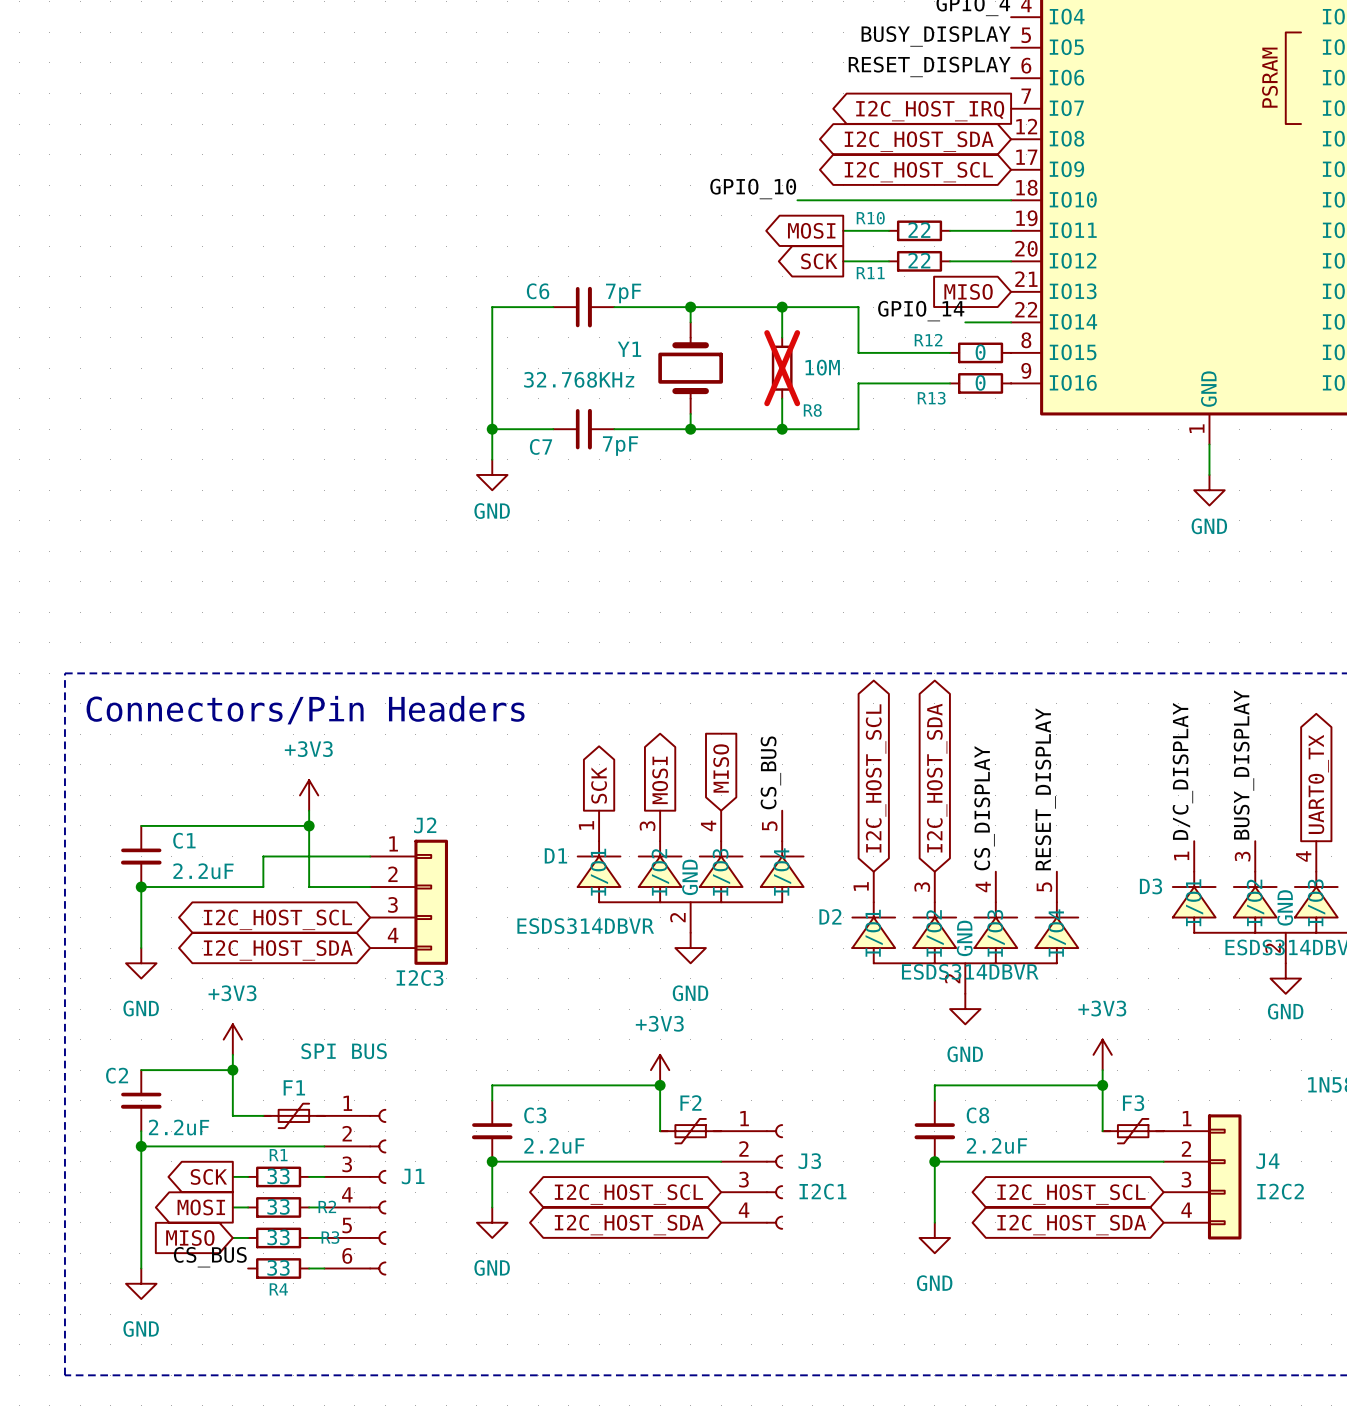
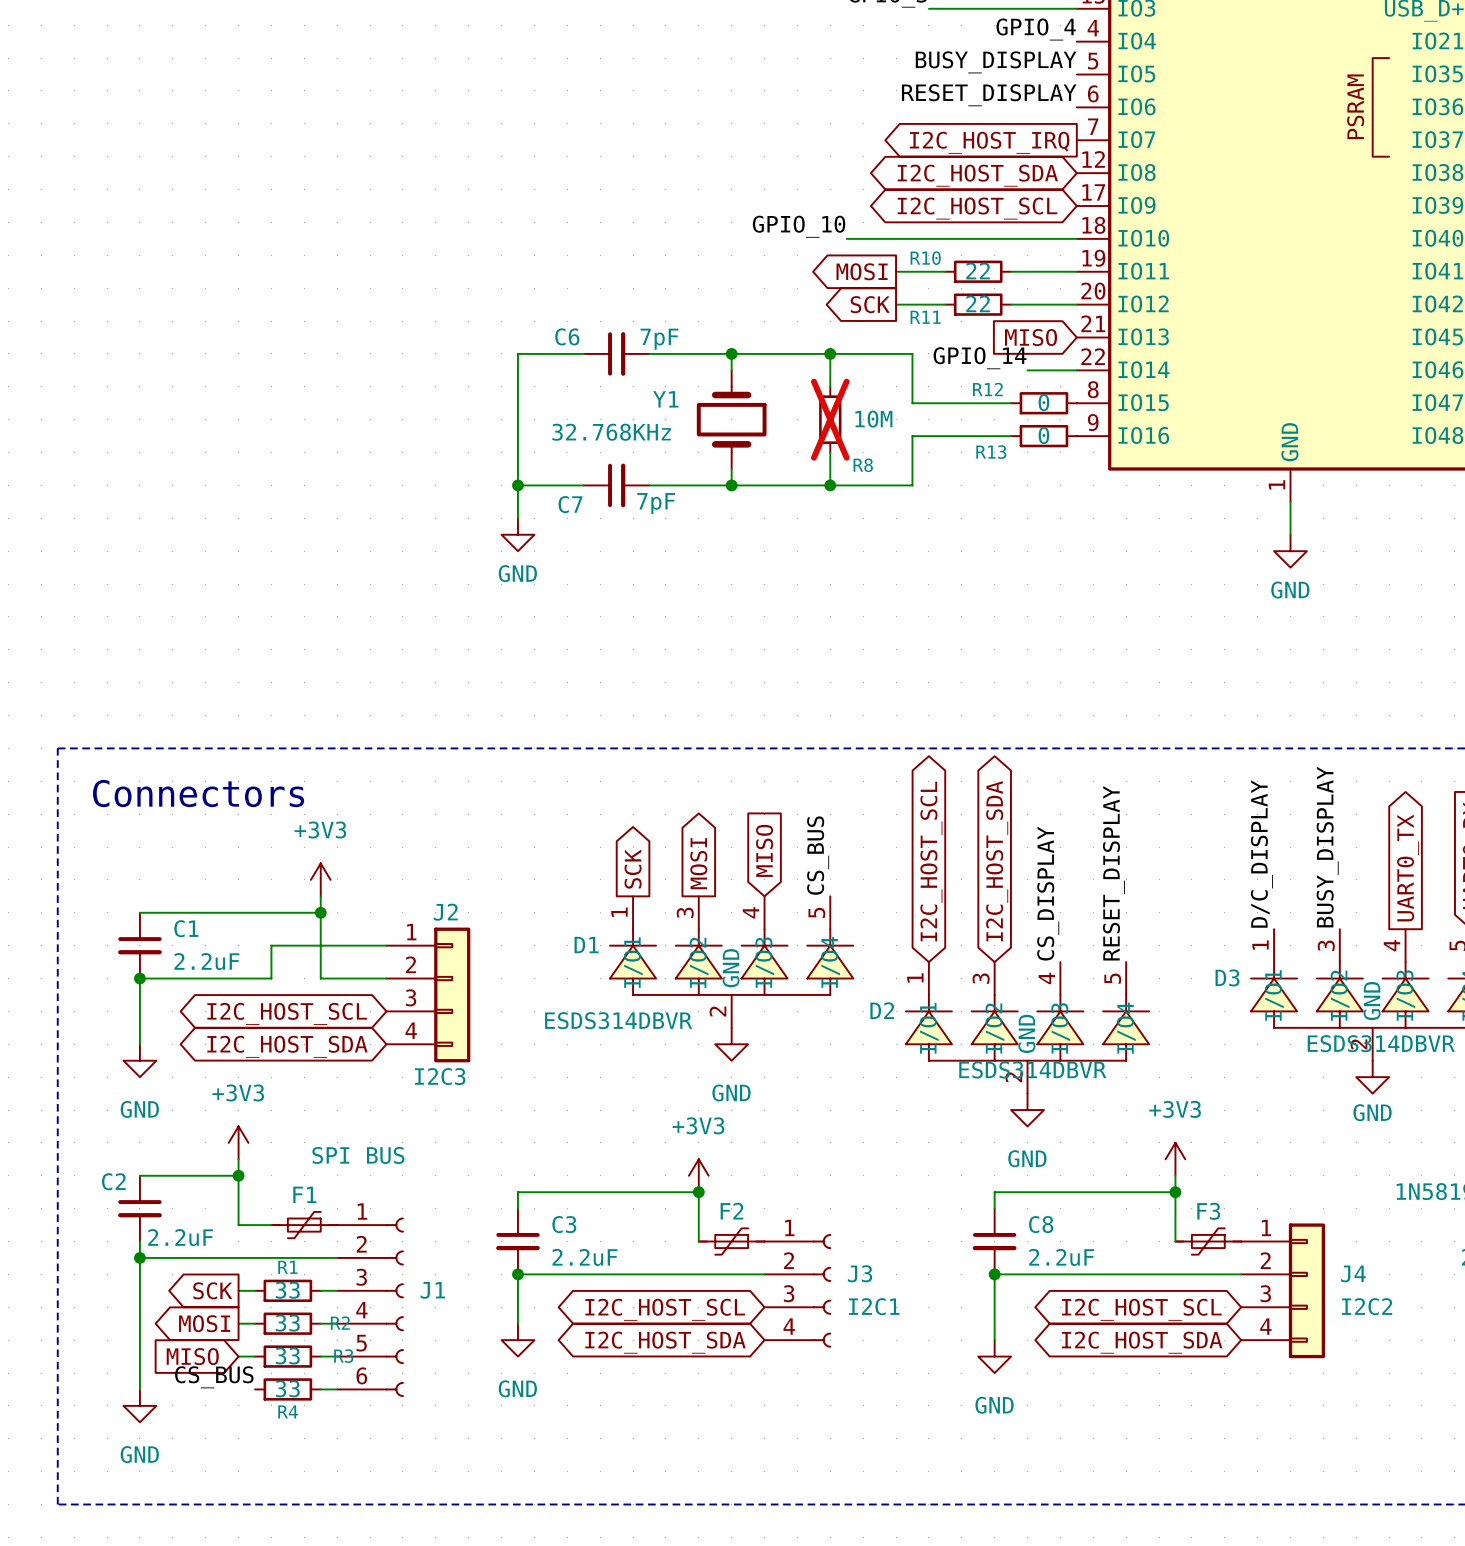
text: Connectors/Pin Headers (305, 710) -> Connectors (198, 793)

